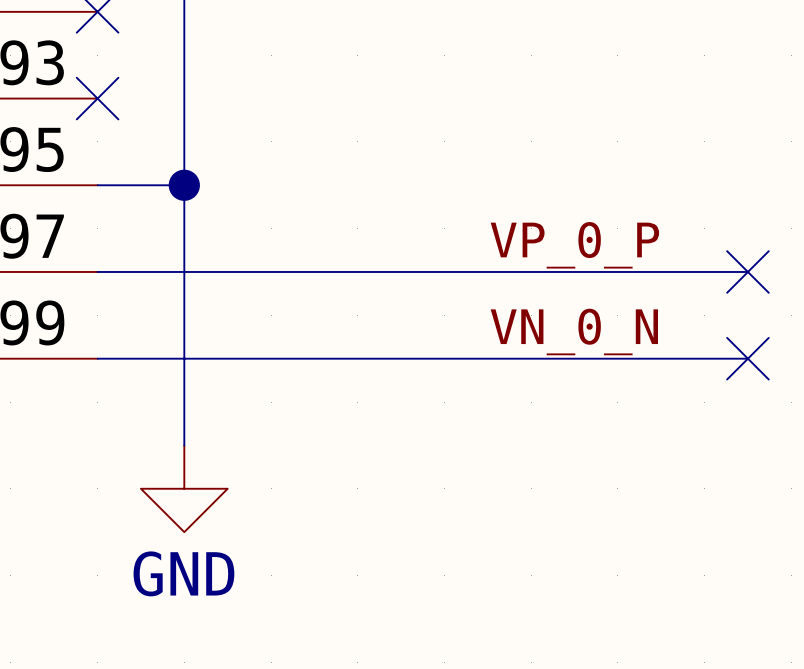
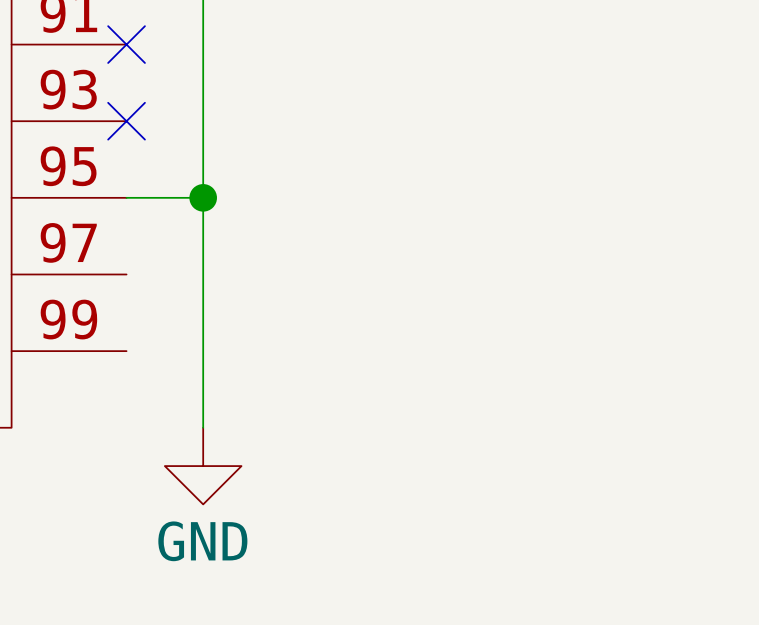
label: VP_0_P (574, 245) -> none
wire: (97, 271) (747, 271) -> none
no-connect mark: (747, 271) -> none
label: VN_0_N (574, 332) -> none
wire: (97, 358) (747, 358) -> none
no-connect mark: (747, 358) -> none

